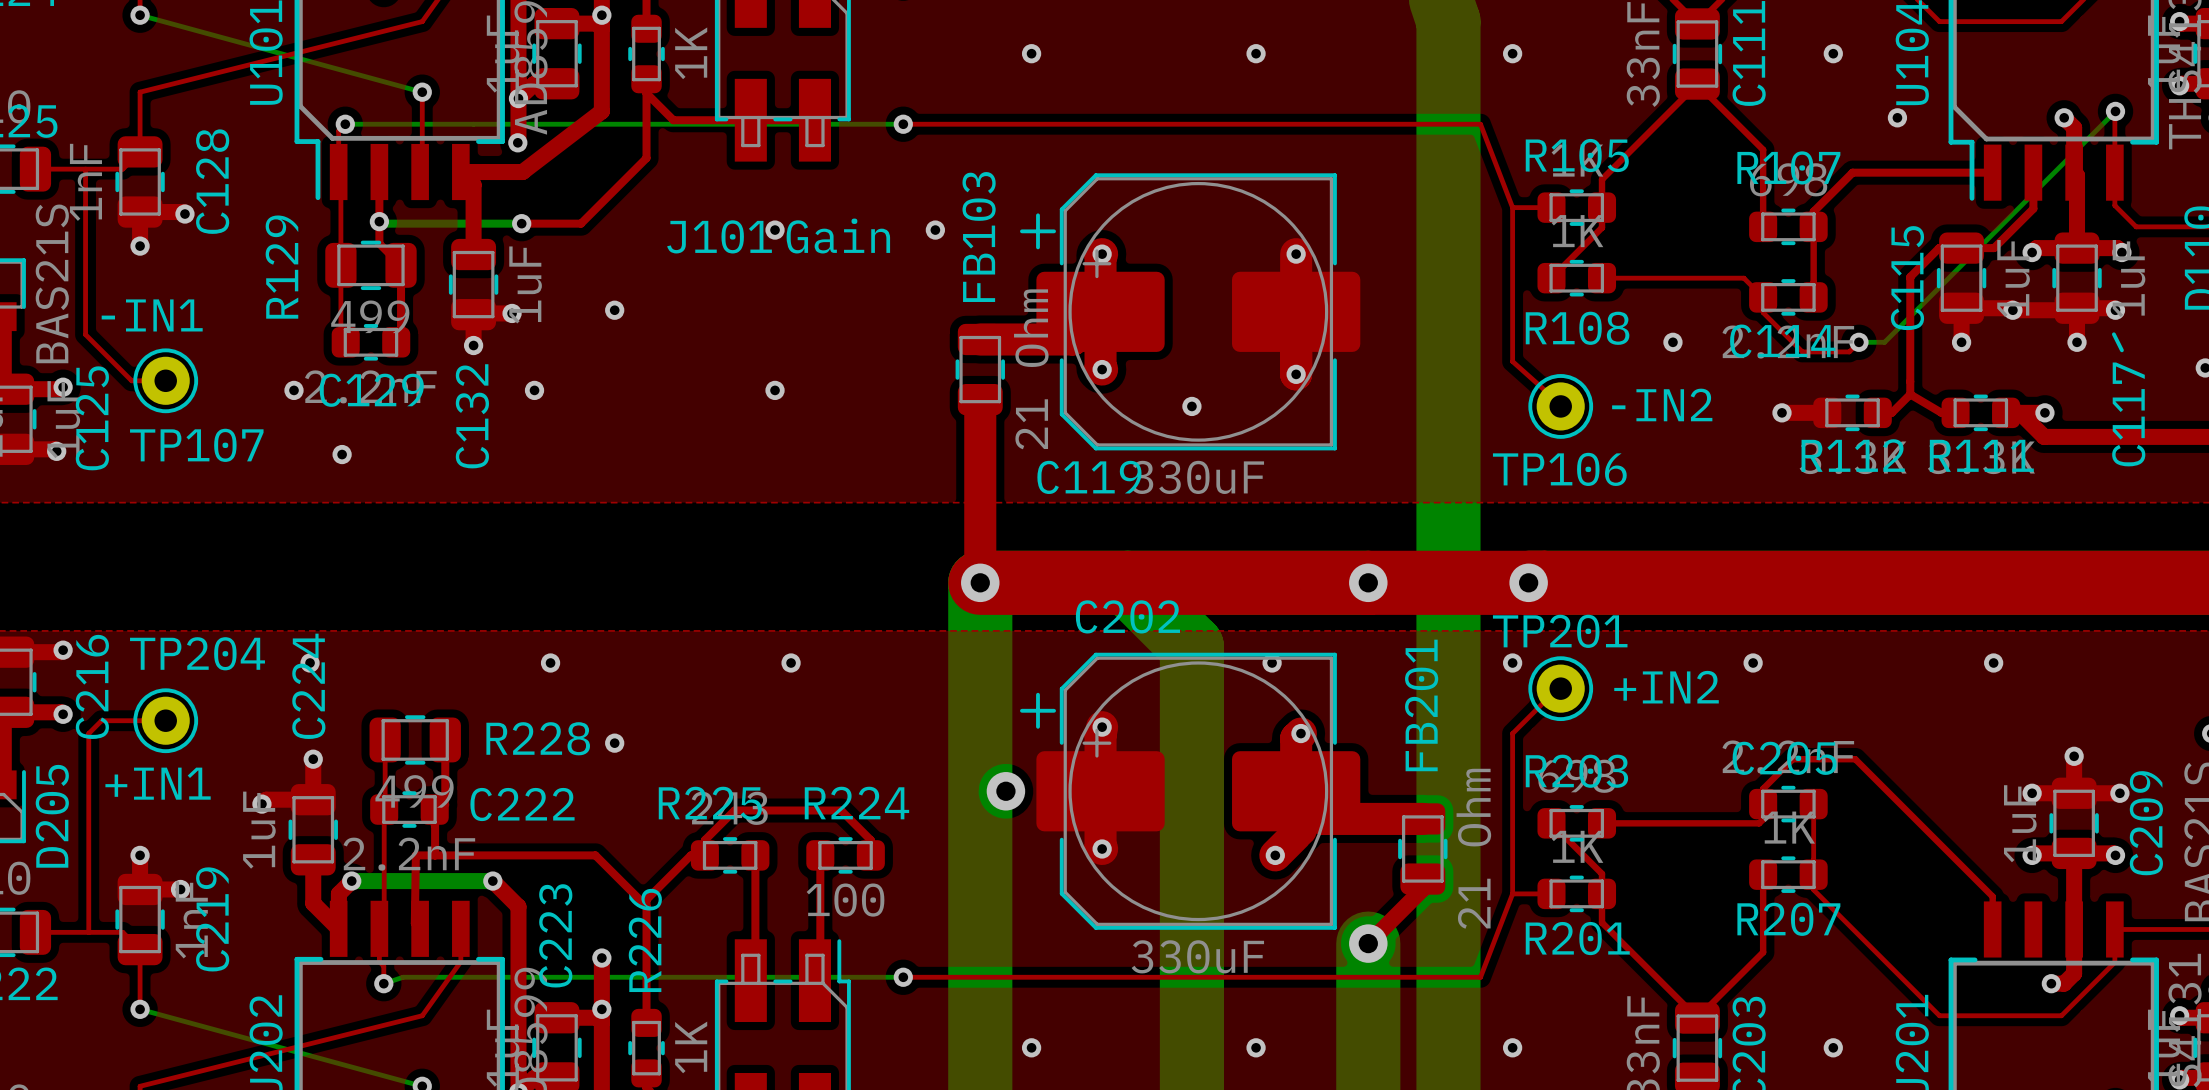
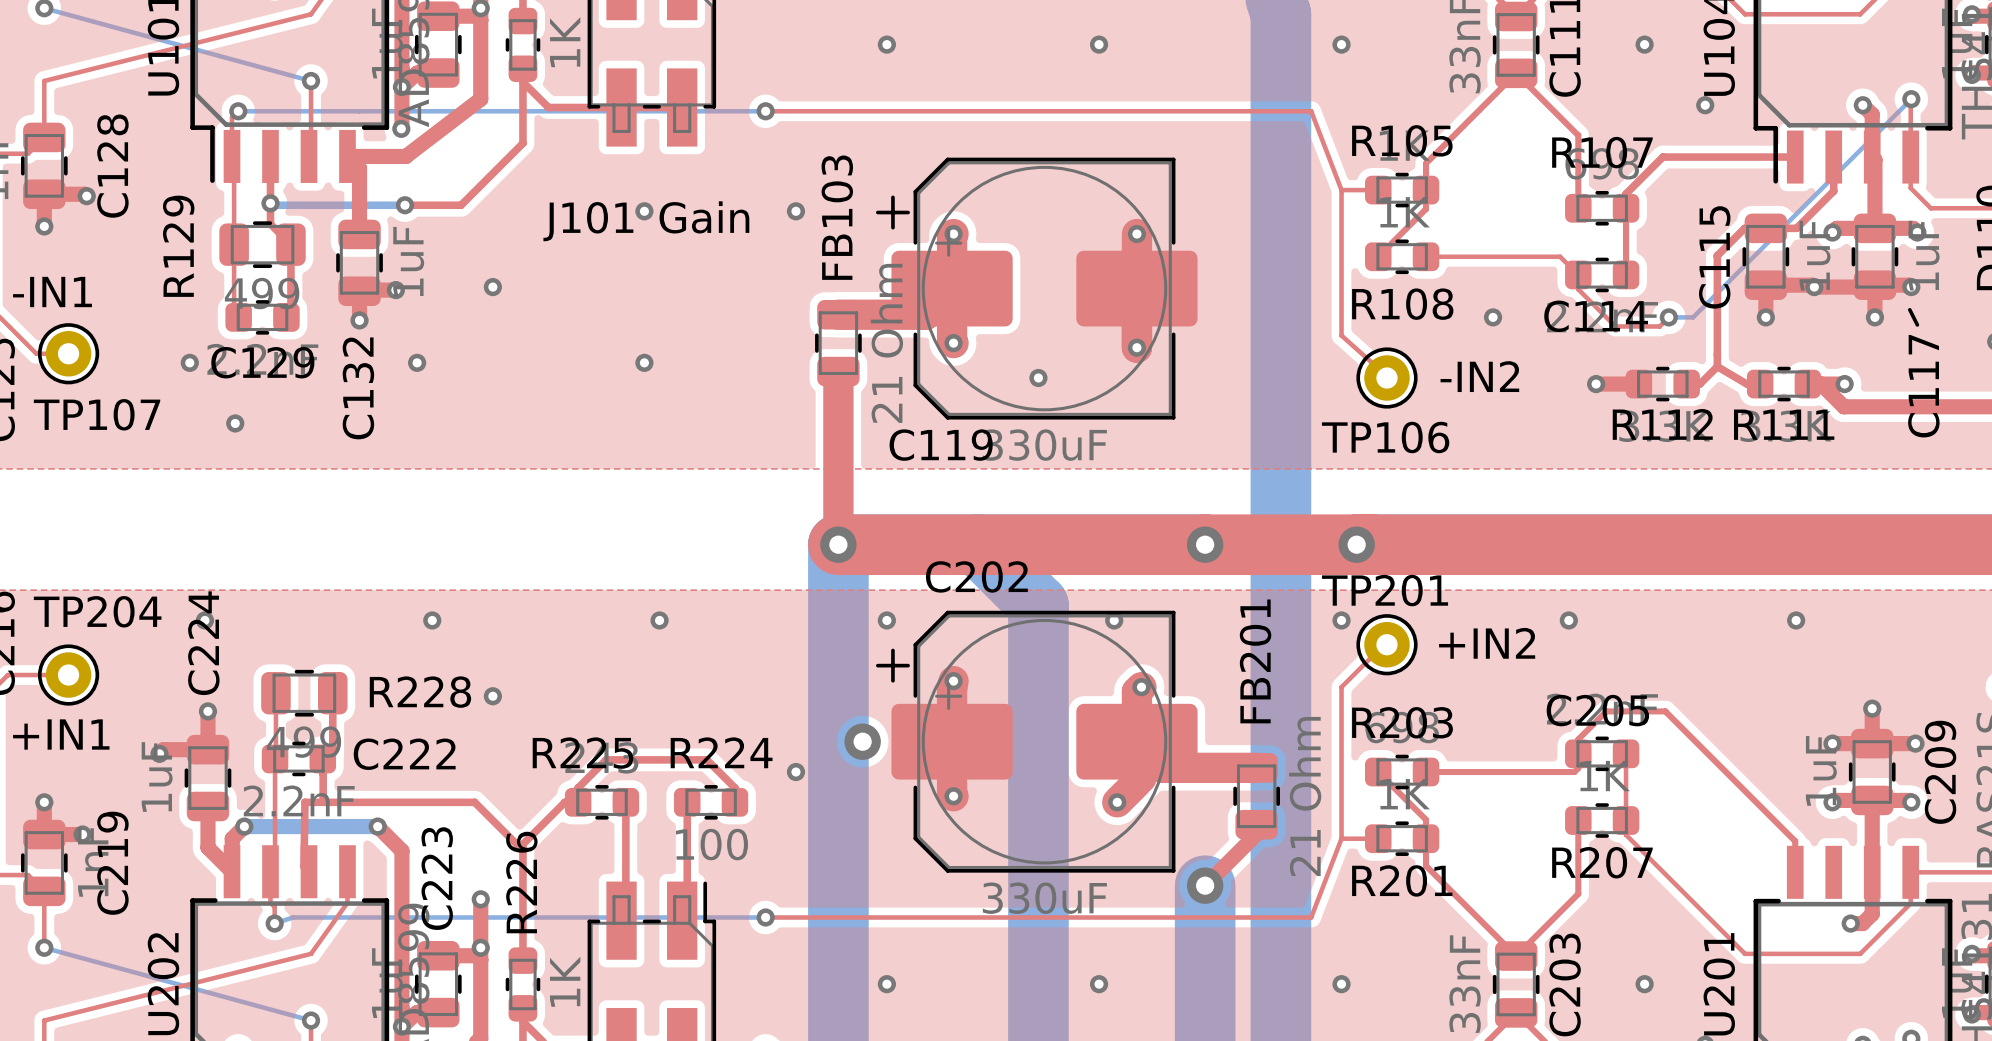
via: none -> (886, 620)
via: none -> (795, 772)

